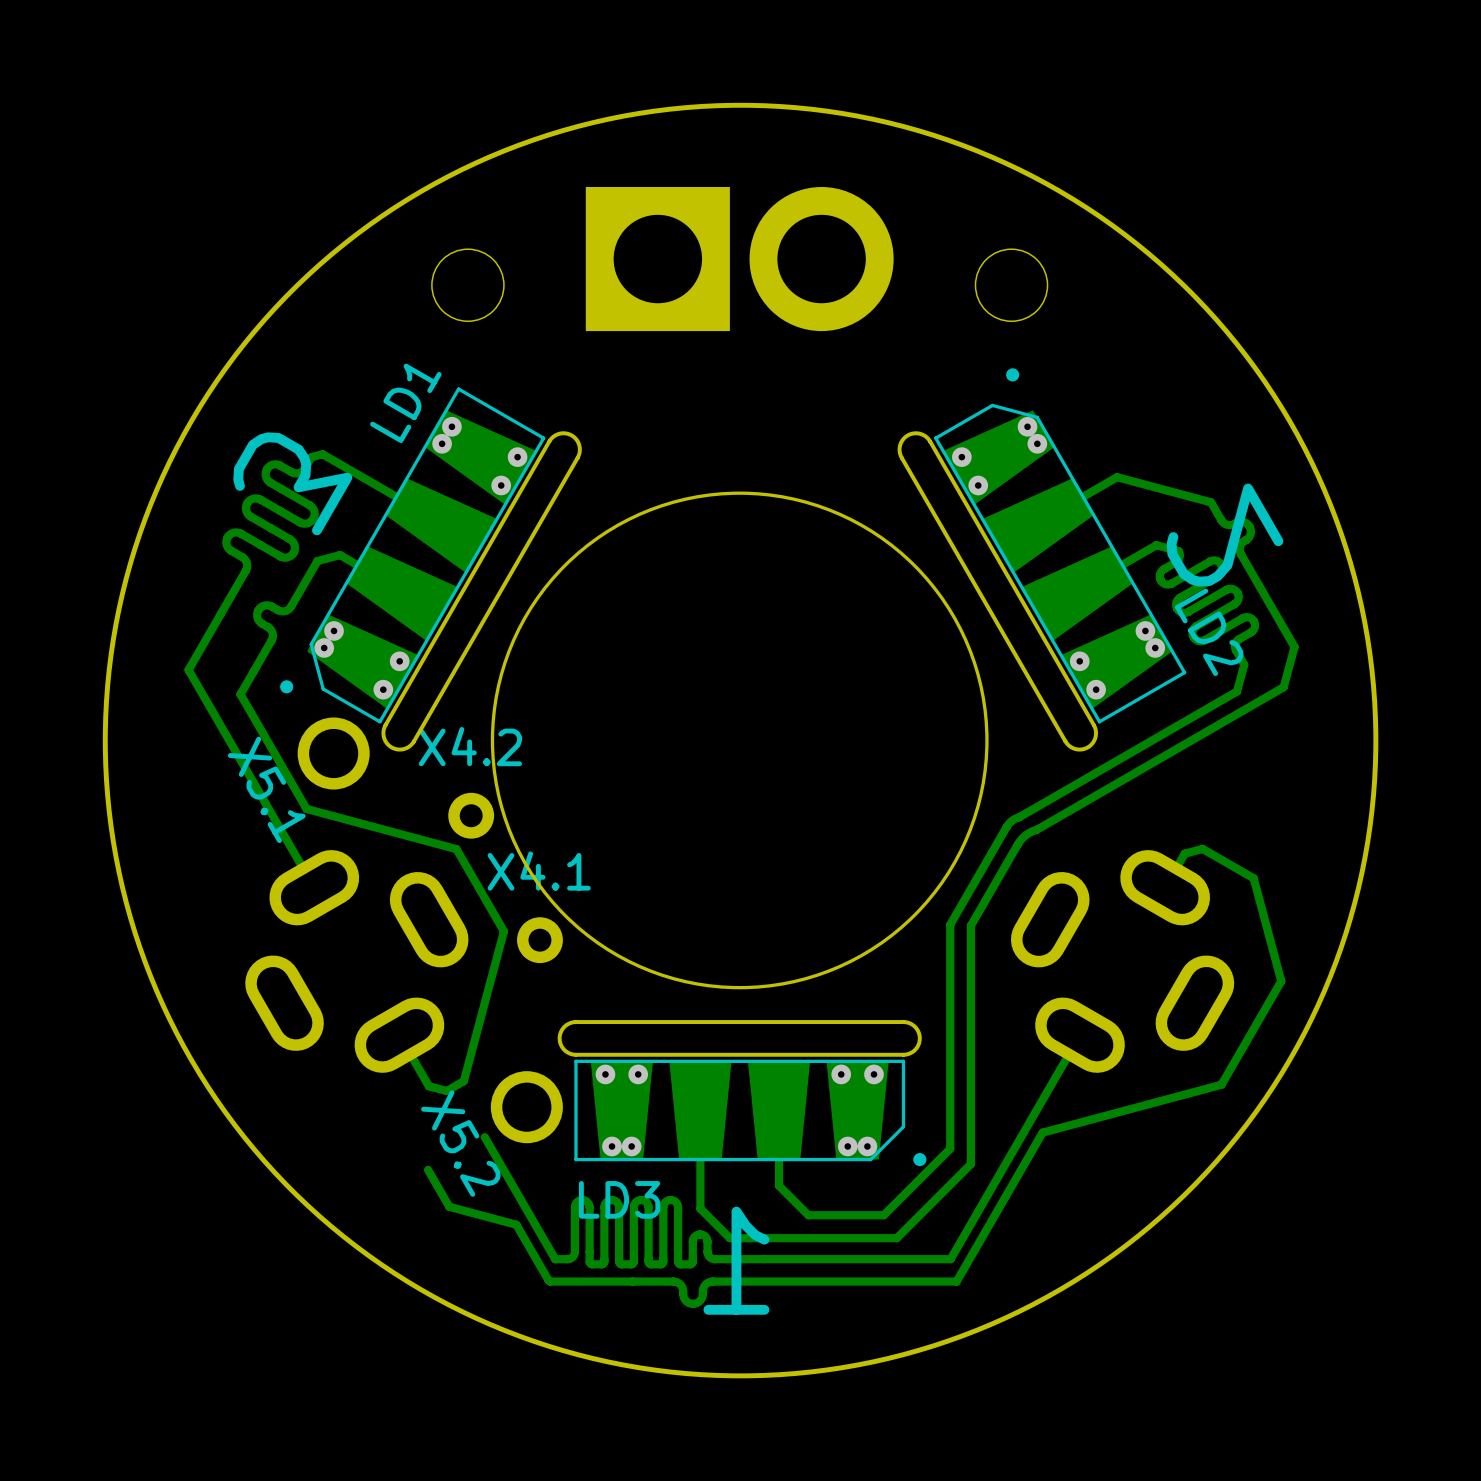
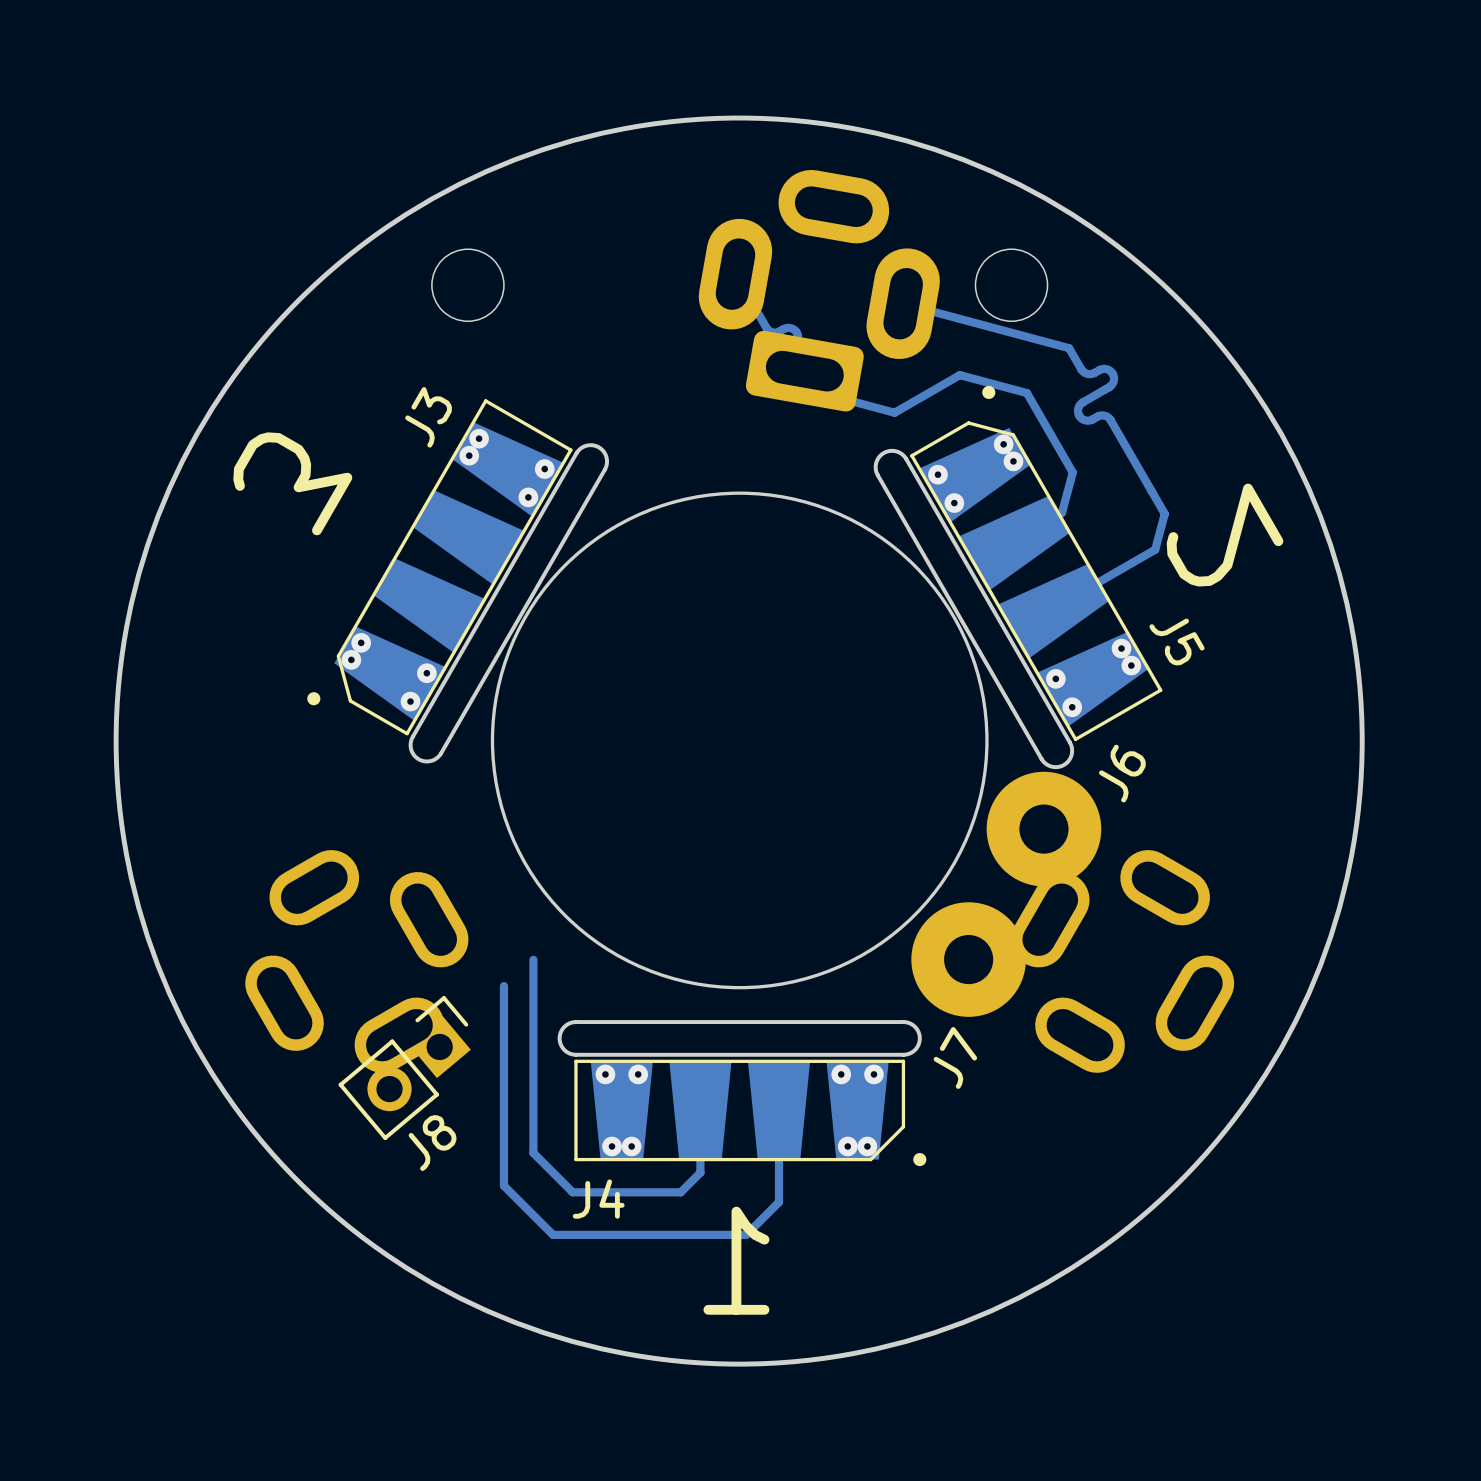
round board edge size: [102, 102, 1379, 1379] -> [113, 115, 1365, 1367]
part: (739, 259) -> none
track: none -> (735, 274) (767, 329) (776, 332) (789, 327) (796, 332) (797, 341) (786, 350) (784, 358) (801, 387) (894, 412) (959, 375) (1026, 393) (1072, 472) (1062, 512) (1016, 538)
part: none -> (819, 290)
track: none -> (903, 303) (1069, 348) (1084, 372) (1092, 373) (1104, 368) (1112, 373) (1113, 379) (1112, 384) (1081, 403) (1078, 408) (1078, 414) (1086, 420) (1101, 415) (1109, 418) (1164, 513) (1155, 549) (1055, 607)
LD1 name: LD1 (405, 403) -> J3 (428, 417)
via: (451, 426) -> none
via: (1027, 426) -> none
via: none -> (479, 438)
via: (442, 443) -> none
via: (1037, 443) -> none
via: none -> (1003, 444)
via: none -> (469, 455)
via: (517, 457) -> none
via: (961, 457) -> none
via: none -> (1013, 461)
via: none -> (544, 469)
via: none -> (937, 474)
via: (501, 485) -> none
via: (978, 485) -> none
via: none -> (528, 497)
via: none -> (954, 503)
track: (438, 521) (322, 454) (311, 457) (304, 469) (298, 473) (293, 472) (275, 464) (268, 467) (265, 472) (269, 481) (312, 507) (314, 514) (310, 521) (300, 522) (258, 498) (250, 499) (246, 505) (246, 511) (249, 516) (292, 541) (294, 548) (291, 555) (286, 557) (281, 556) (238, 532) (231, 533) (227, 538) (227, 547) (244, 559) (246, 568) (188, 669) (314, 887) -> none
track: (1040, 521) (1117, 477) (1211, 502) (1225, 524) (1231, 525) (1241, 521) (1247, 523) (1250, 527) (1250, 534) (1241, 544) (1240, 553) (1294, 646) (1283, 687) (1029, 832) (1020, 840) (970, 925) (970, 1164) (896, 1238) (729, 1238) (700, 1208) (700, 1172) -> (533, 959) (533, 1153) (572, 1192) (680, 1192) (700, 1172)
LD2 position: (1041, 559) -> (1018, 577)
LD1 position: (430, 569) -> (458, 581)
track: (399, 589) (340, 555) (317, 561) (289, 609) (280, 611) (266, 605) (258, 610) (258, 620) (270, 629) (272, 637) (240, 694) (306, 808) (456, 849) (503, 931) (463, 1081) (446, 1091) (428, 1086) (399, 1035) -> none
track: (1079, 589) (1156, 545) (1178, 551) (1179, 553) (1177, 561) (1160, 573) (1160, 580) (1165, 584) (1172, 583) (1211, 561) (1218, 561) (1222, 567) (1219, 574) (1179, 598) (1176, 605) (1179, 611) (1185, 612) (1227, 589) (1232, 589) (1237, 591) (1238, 597) (1236, 602) (1195, 626) (1192, 633) (1195, 639) (1202, 641) (1243, 617) (1249, 617) (1253, 620) (1255, 625) (1253, 630) (1238, 639) (1235, 644) (1235, 649) (1244, 664) (1237, 691) (1014, 819) (1006, 826) (950, 924) (950, 1148) (883, 1215) (808, 1215) (779, 1185) -> (503, 986) (503, 1185) (553, 1234) (746, 1234) (779, 1202) (779, 1185)
via: (334, 630) -> none
via: (1145, 630) -> none
LD2 name: LD2 (1209, 632) -> J5 (1177, 642)
via: none -> (361, 642)
via: (324, 647) -> none
via: (1155, 647) -> none
via: none -> (1121, 648)
via: none -> (351, 659)
via: (399, 661) -> none
via: (1079, 661) -> none
via: none -> (1131, 665)
via: none -> (426, 673)
via: none -> (1055, 678)
via: (383, 689) -> none
via: (1096, 689) -> none
via: none -> (410, 701)
via: none -> (1072, 707)
X5.1: (333, 753) -> none
X4.2: (471, 815) -> none
J6: none -> (1043, 829)
track: (1165, 887) (1184, 853) (1202, 848) (1253, 878) (1281, 981) (1221, 1084) (1042, 1132) (956, 1281) (711, 1281) (704, 1286) (700, 1299) (693, 1303) (685, 1299) (681, 1286) (674, 1281) (550, 1281) (516, 1224) (449, 1206) (428, 1169) -> none
X4.1: (539, 940) -> none
J7: none -> (968, 959)
track: (1080, 1035) (950, 1259) (713, 1259) (708, 1254) (706, 1238) (700, 1234) (695, 1235) (693, 1239) (692, 1263) (679, 1264) (678, 1261) (677, 1206) (675, 1201) (670, 1200) (665, 1202) (663, 1206) (663, 1262) (650, 1264) (648, 1261) (648, 1206) (645, 1201) (641, 1200) (636, 1202) (633, 1206) (632, 1263) (619, 1262) (619, 1206) (616, 1201) (611, 1200) (607, 1201) (604, 1206) (603, 1263) (591, 1264) (589, 1262) (589, 1206) (587, 1202) (583, 1200) (577, 1201) (574, 1206) (574, 1254) (569, 1258) (555, 1259) -> none
J8: none -> (404, 1068)
X5.2: (526, 1107) -> none
track: (484, 1137) (555, 1259) -> none
LD3 name: LD3 (619, 1199) -> J4 (598, 1199)

